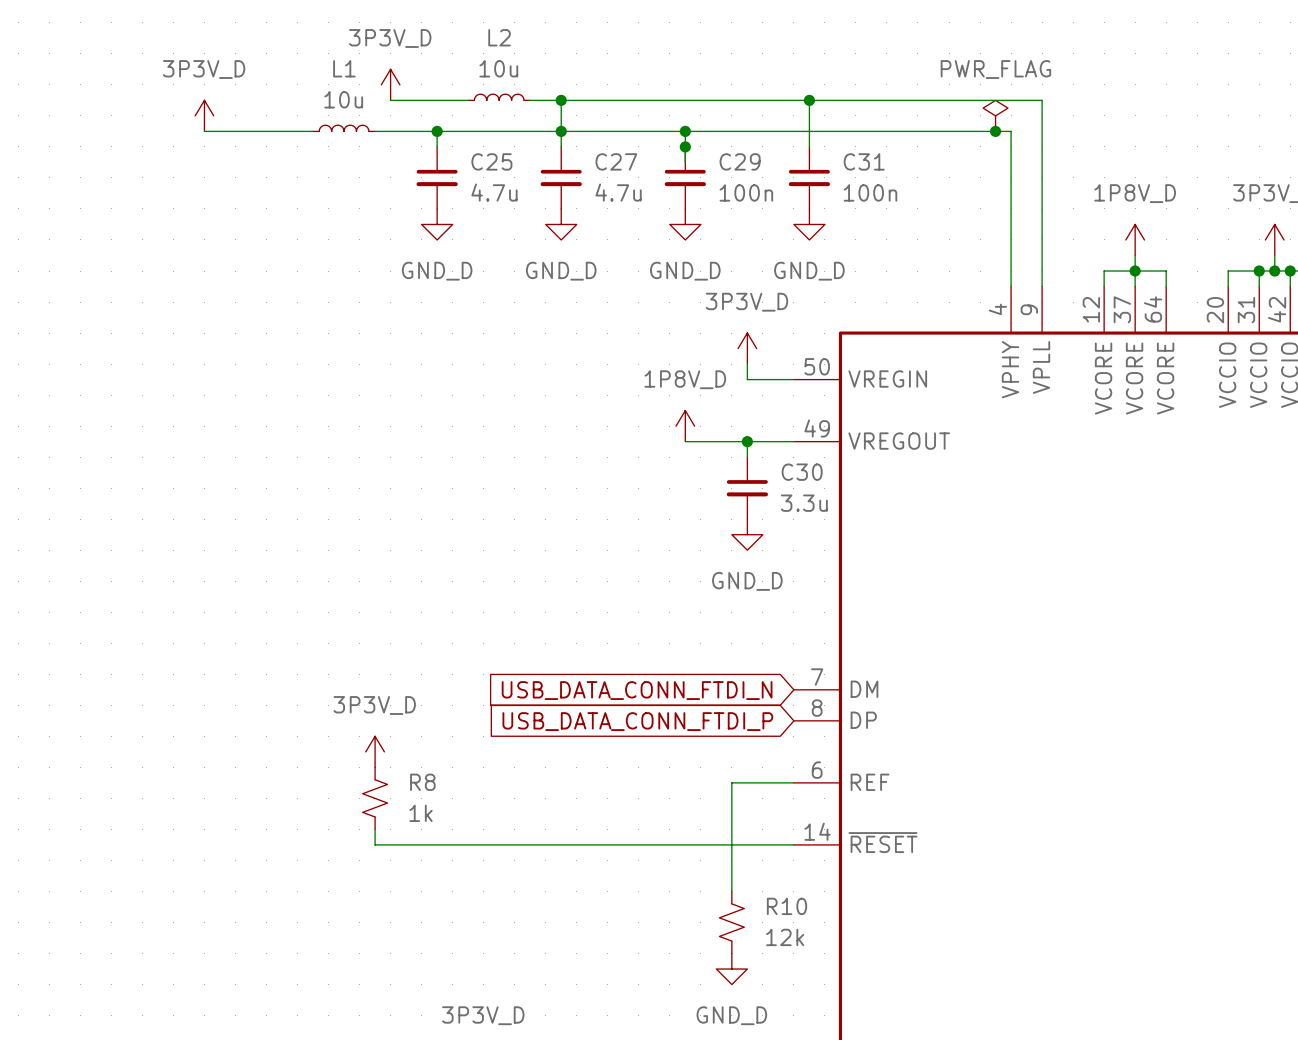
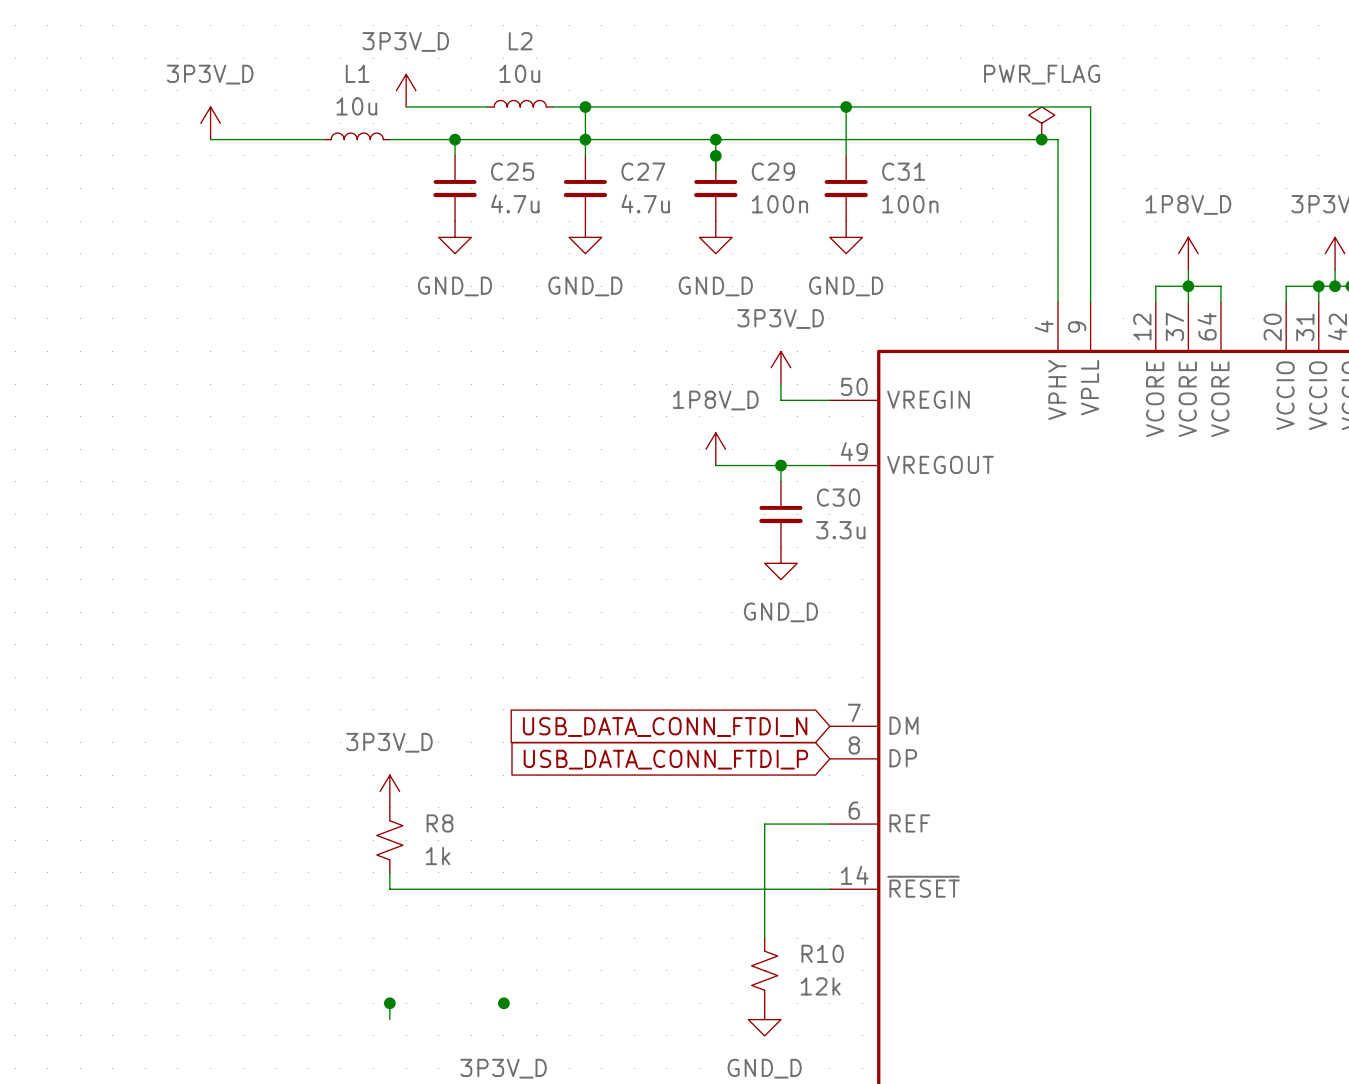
wire: none -> (389, 1003) (389, 1019)
junction: none -> (389, 1003)
junction: none -> (503, 1003)

